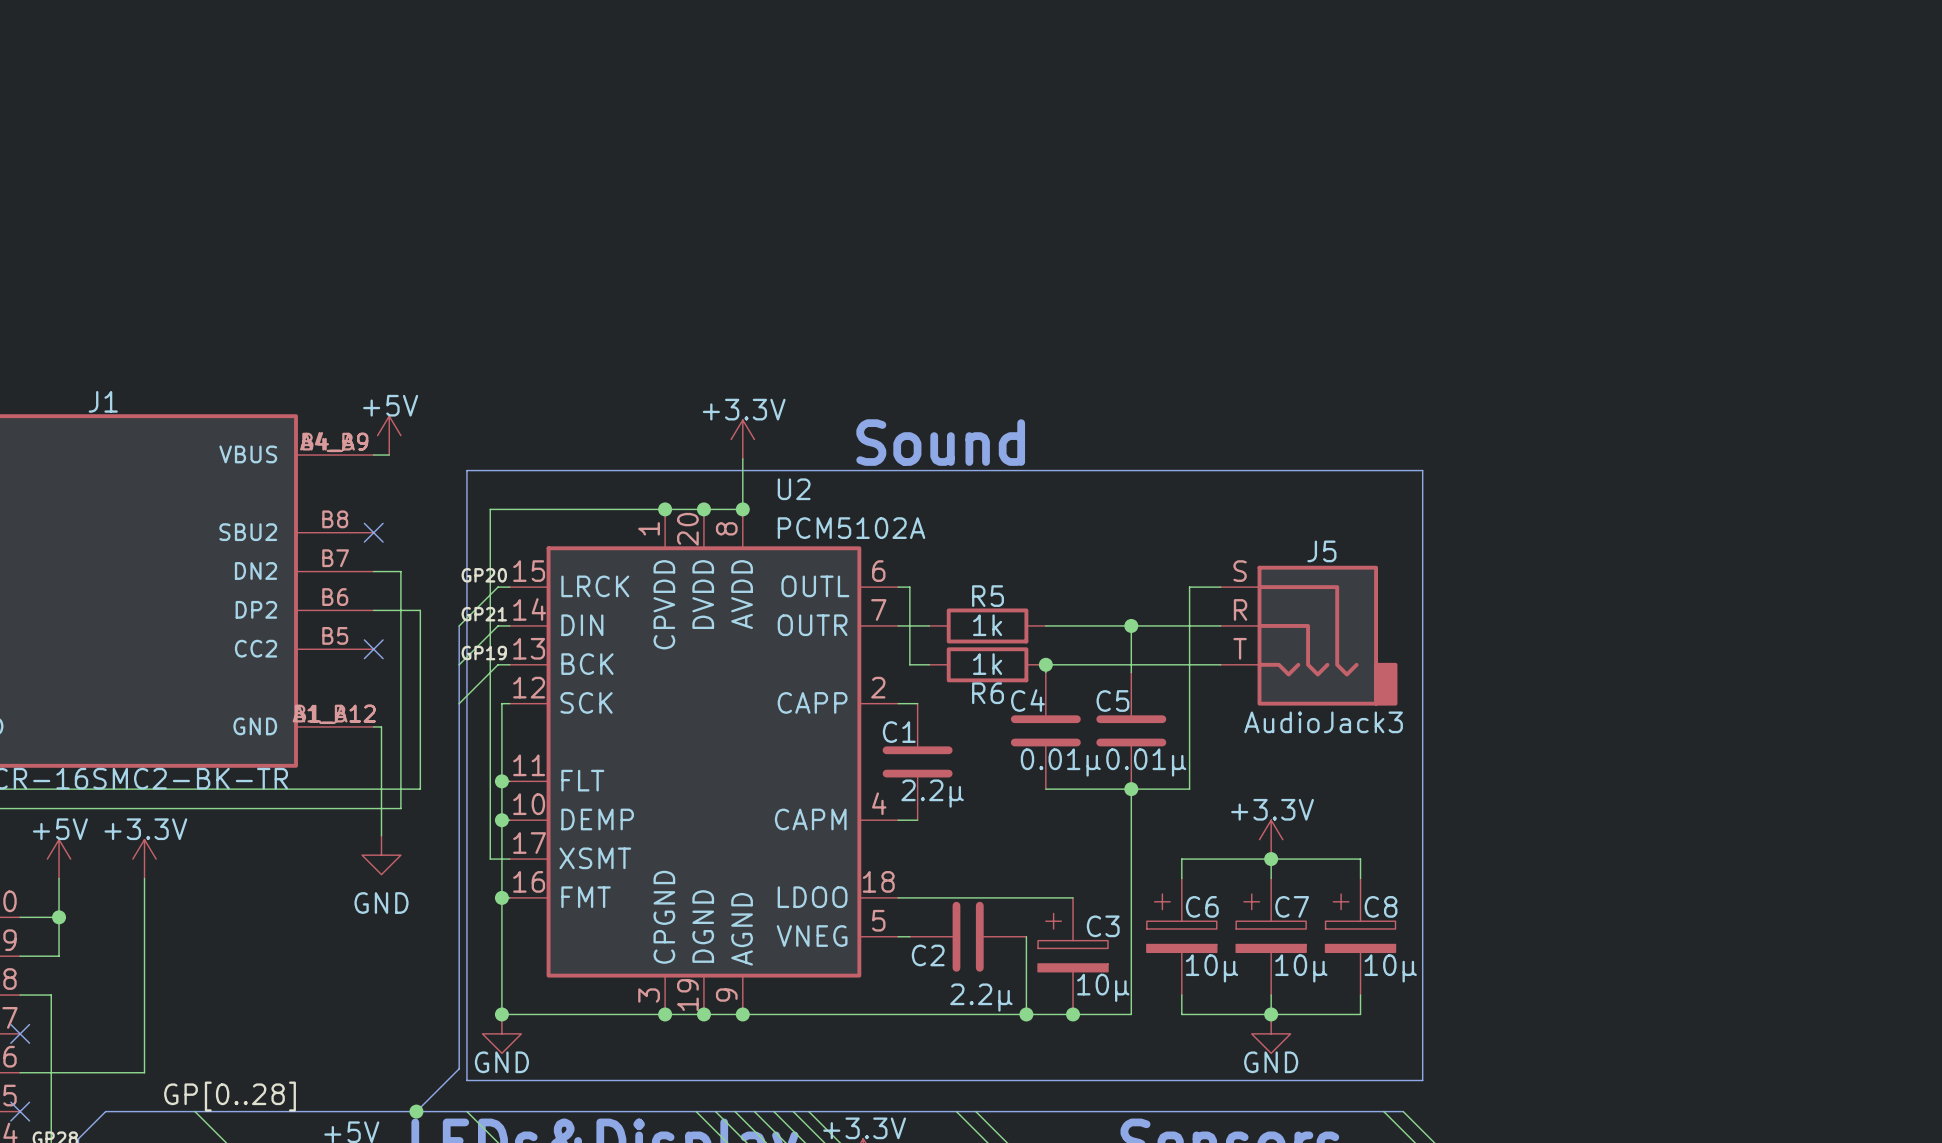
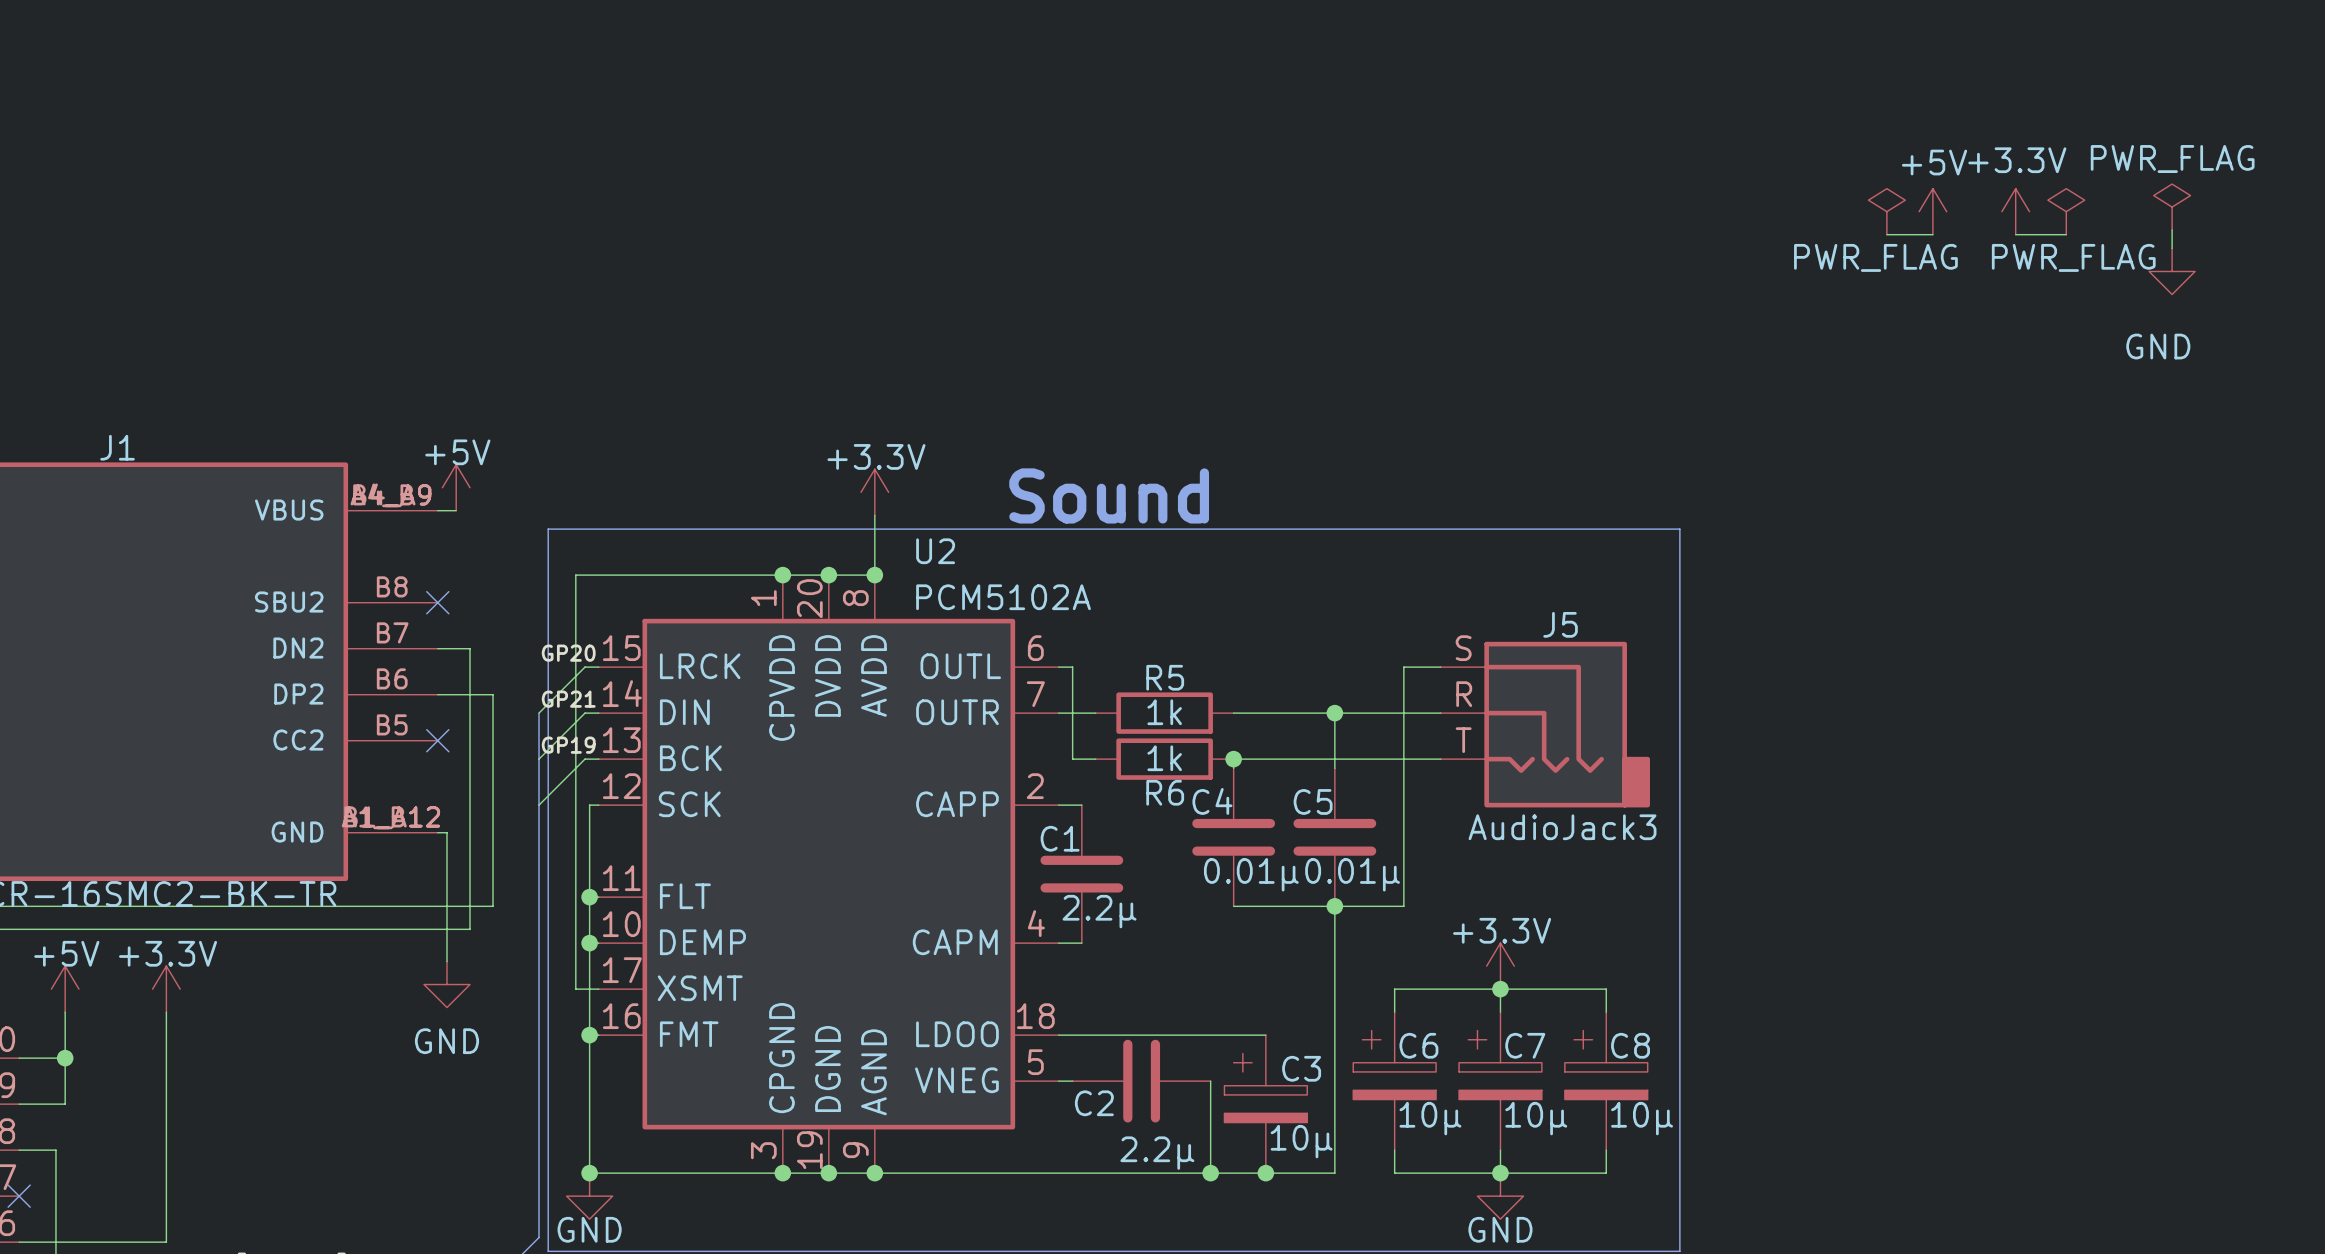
power symbol: none -> PWR_FLAG (2172, 207)
power symbol: none -> PWR_FLAG (1886, 211)
power symbol: none -> +5V (1932, 211)
power symbol: none -> +3.3V (2015, 211)
power symbol: none -> PWR_FLAG (2066, 211)
wire: none -> (2172, 230) (2172, 248)
wire: none -> (1886, 234) (1932, 234)
wire: none -> (2015, 234) (2066, 234)
power symbol: none -> GND (2172, 271)

